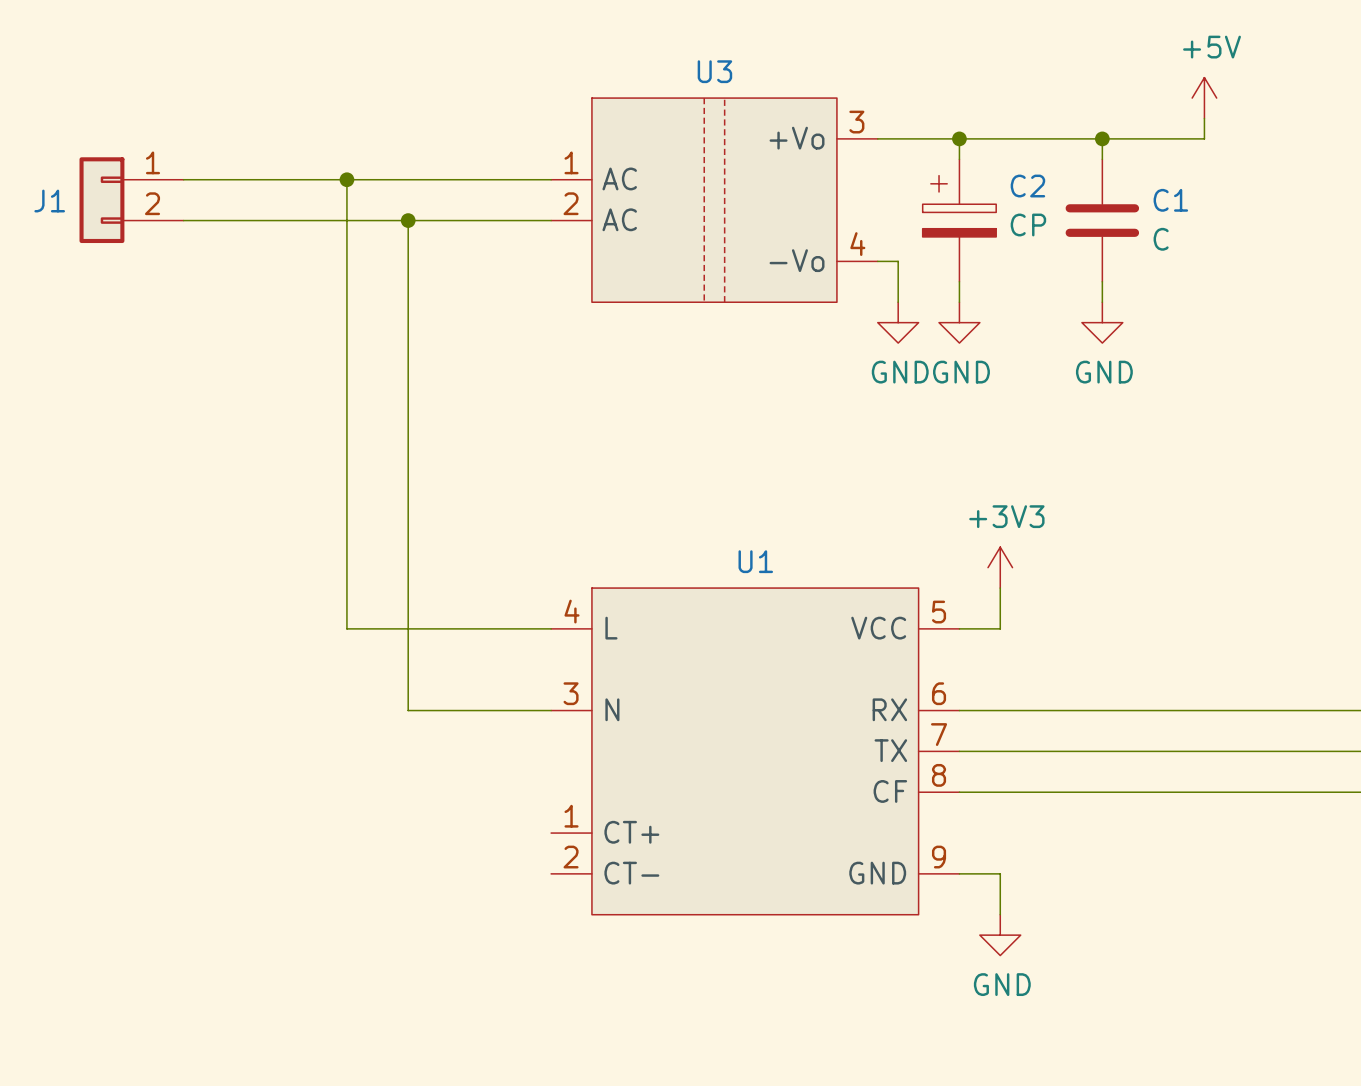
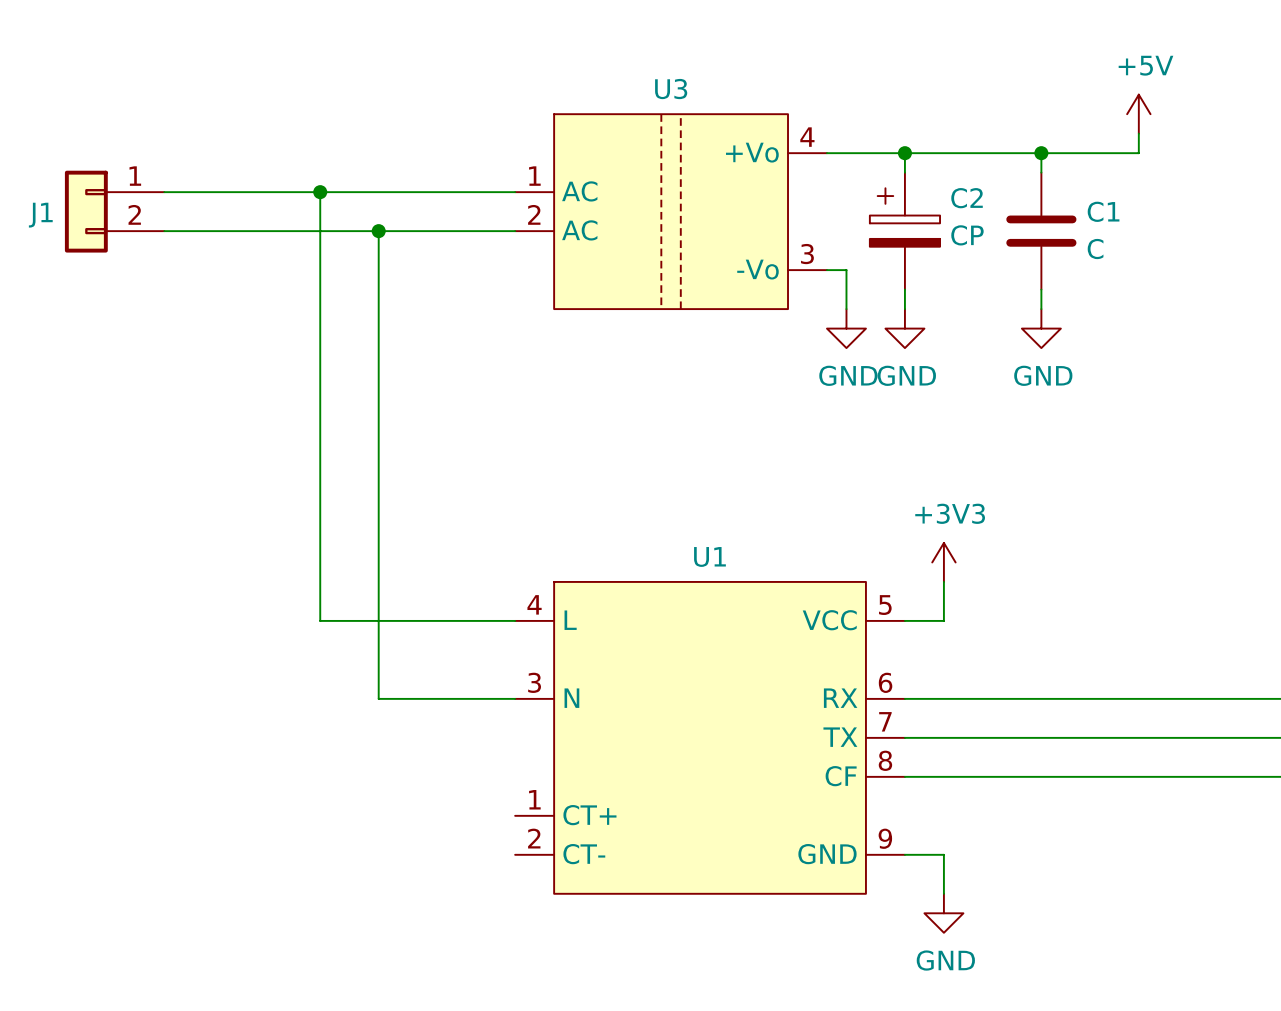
U3 pin number: 3 (856, 122) -> 4 (807, 137)
U3 pin number: 4 (857, 244) -> 3 (807, 254)

